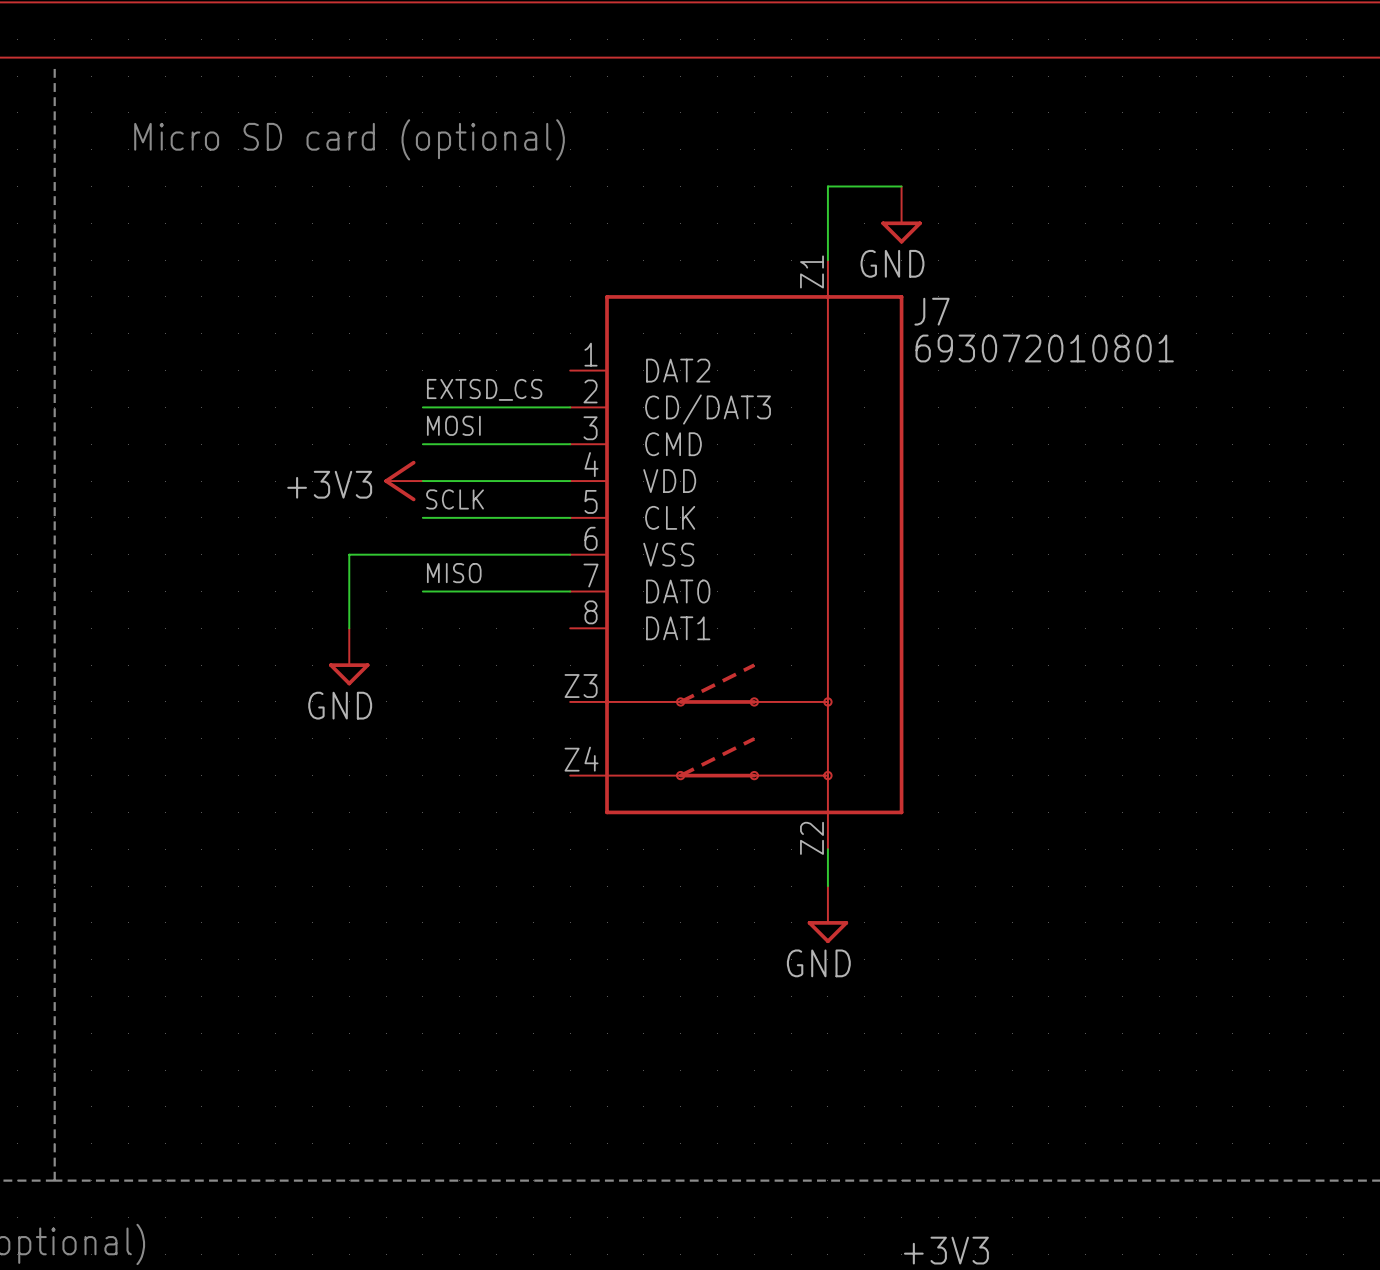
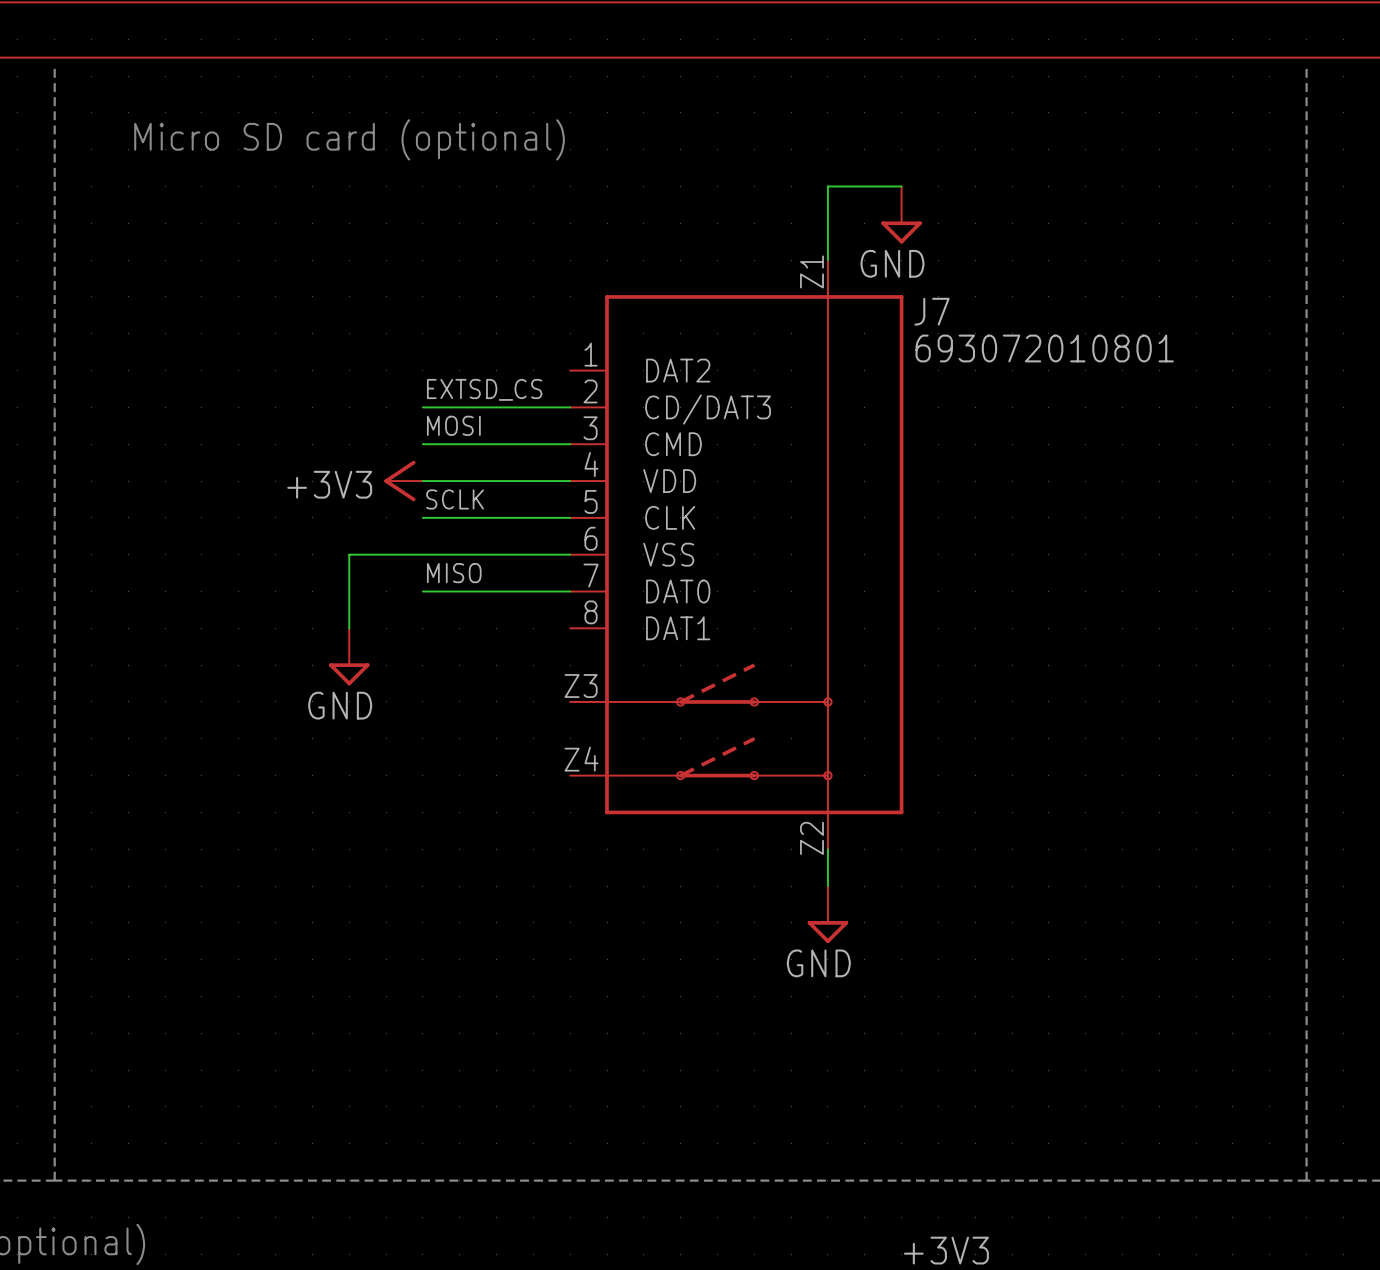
line: none -> (1306, 66) (1306, 1180)

